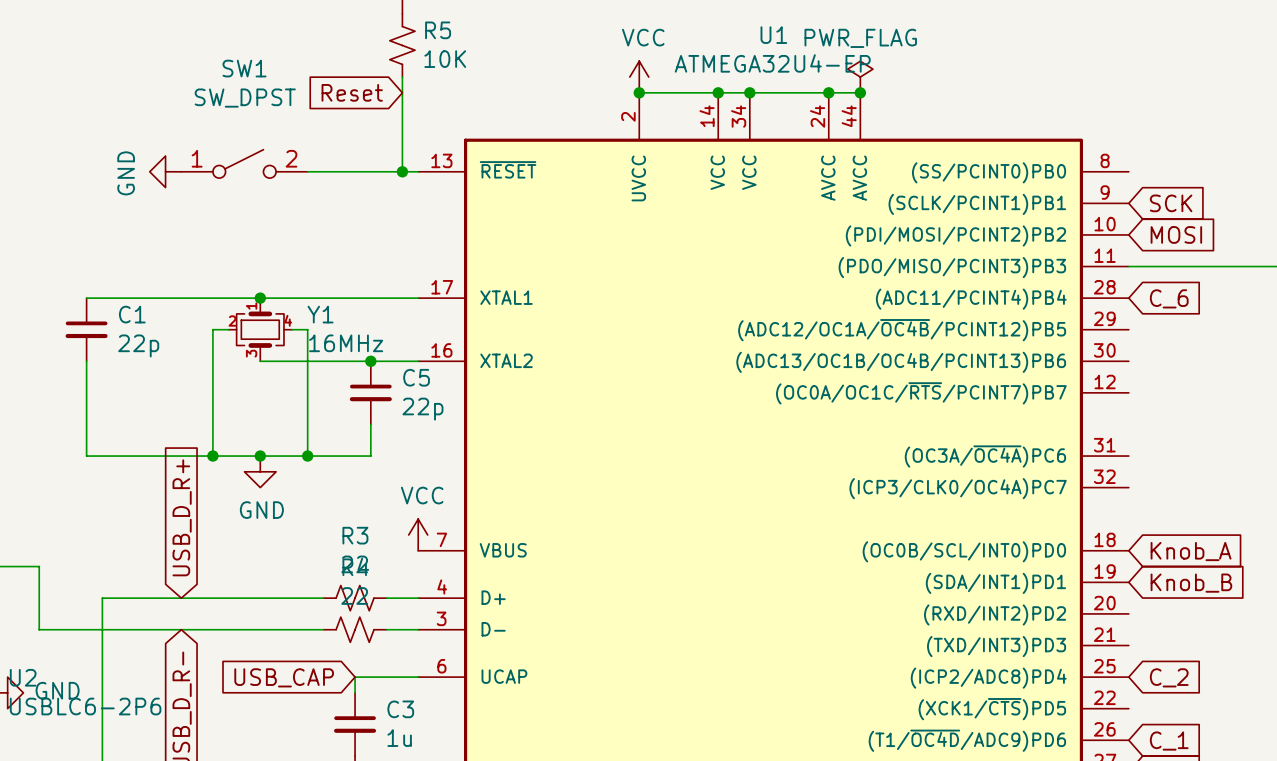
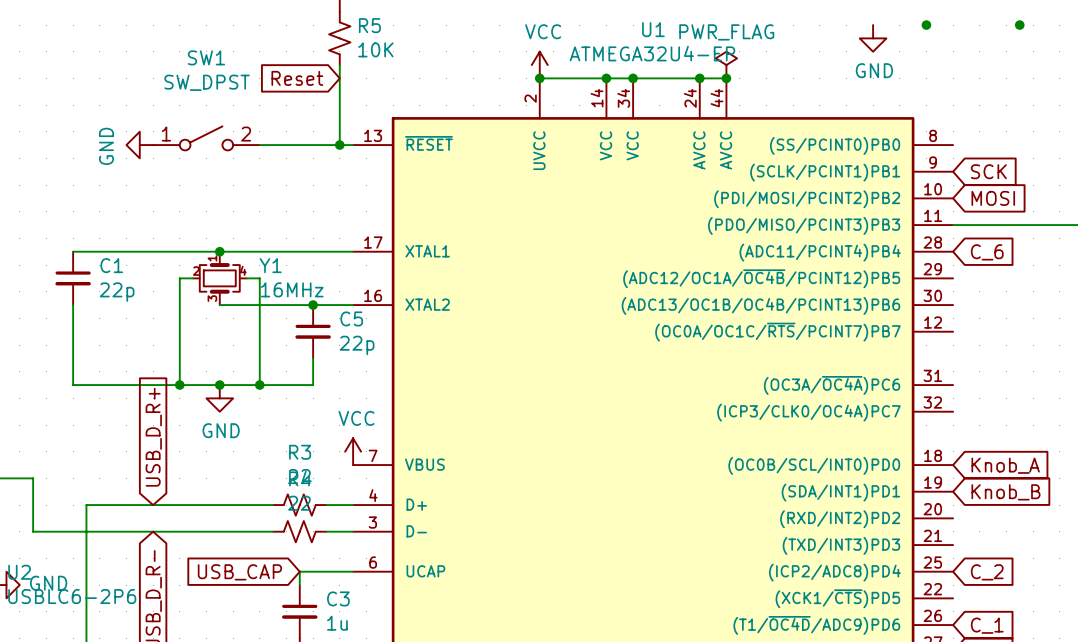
junction: none -> (926, 25)
junction: none -> (1019, 25)
power symbol: none -> GND (873, 38)

